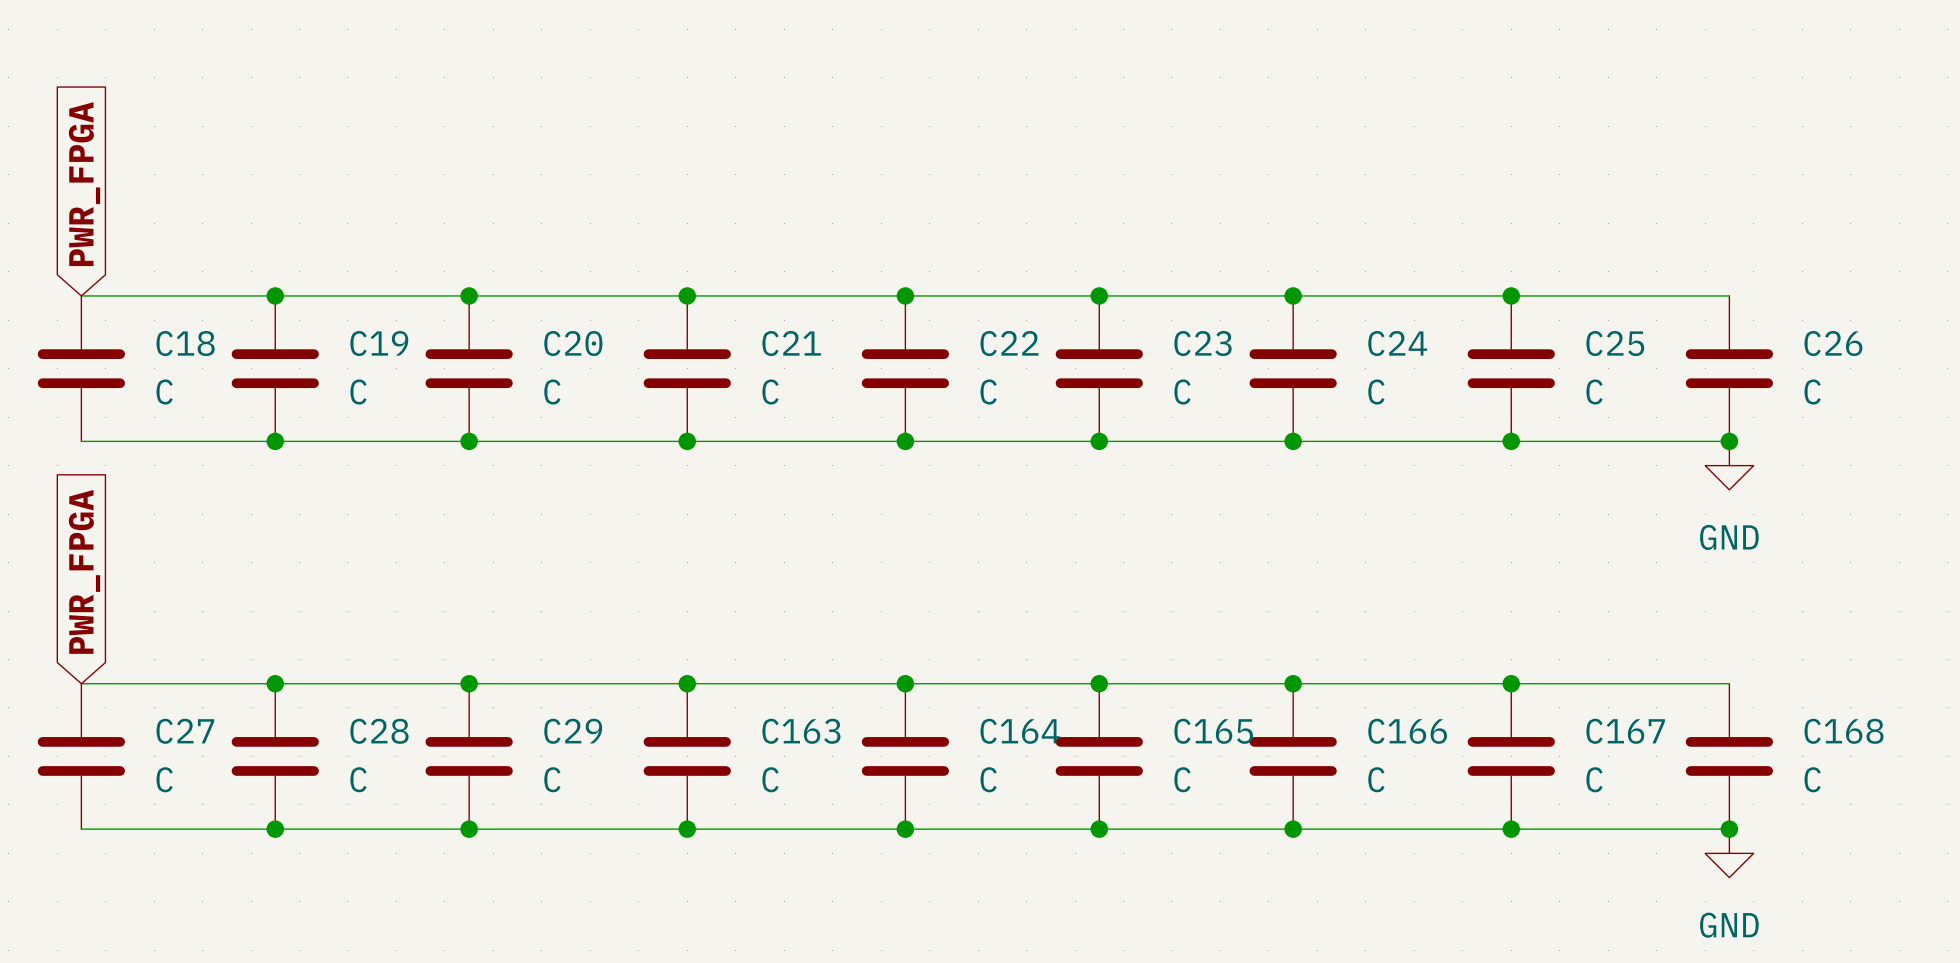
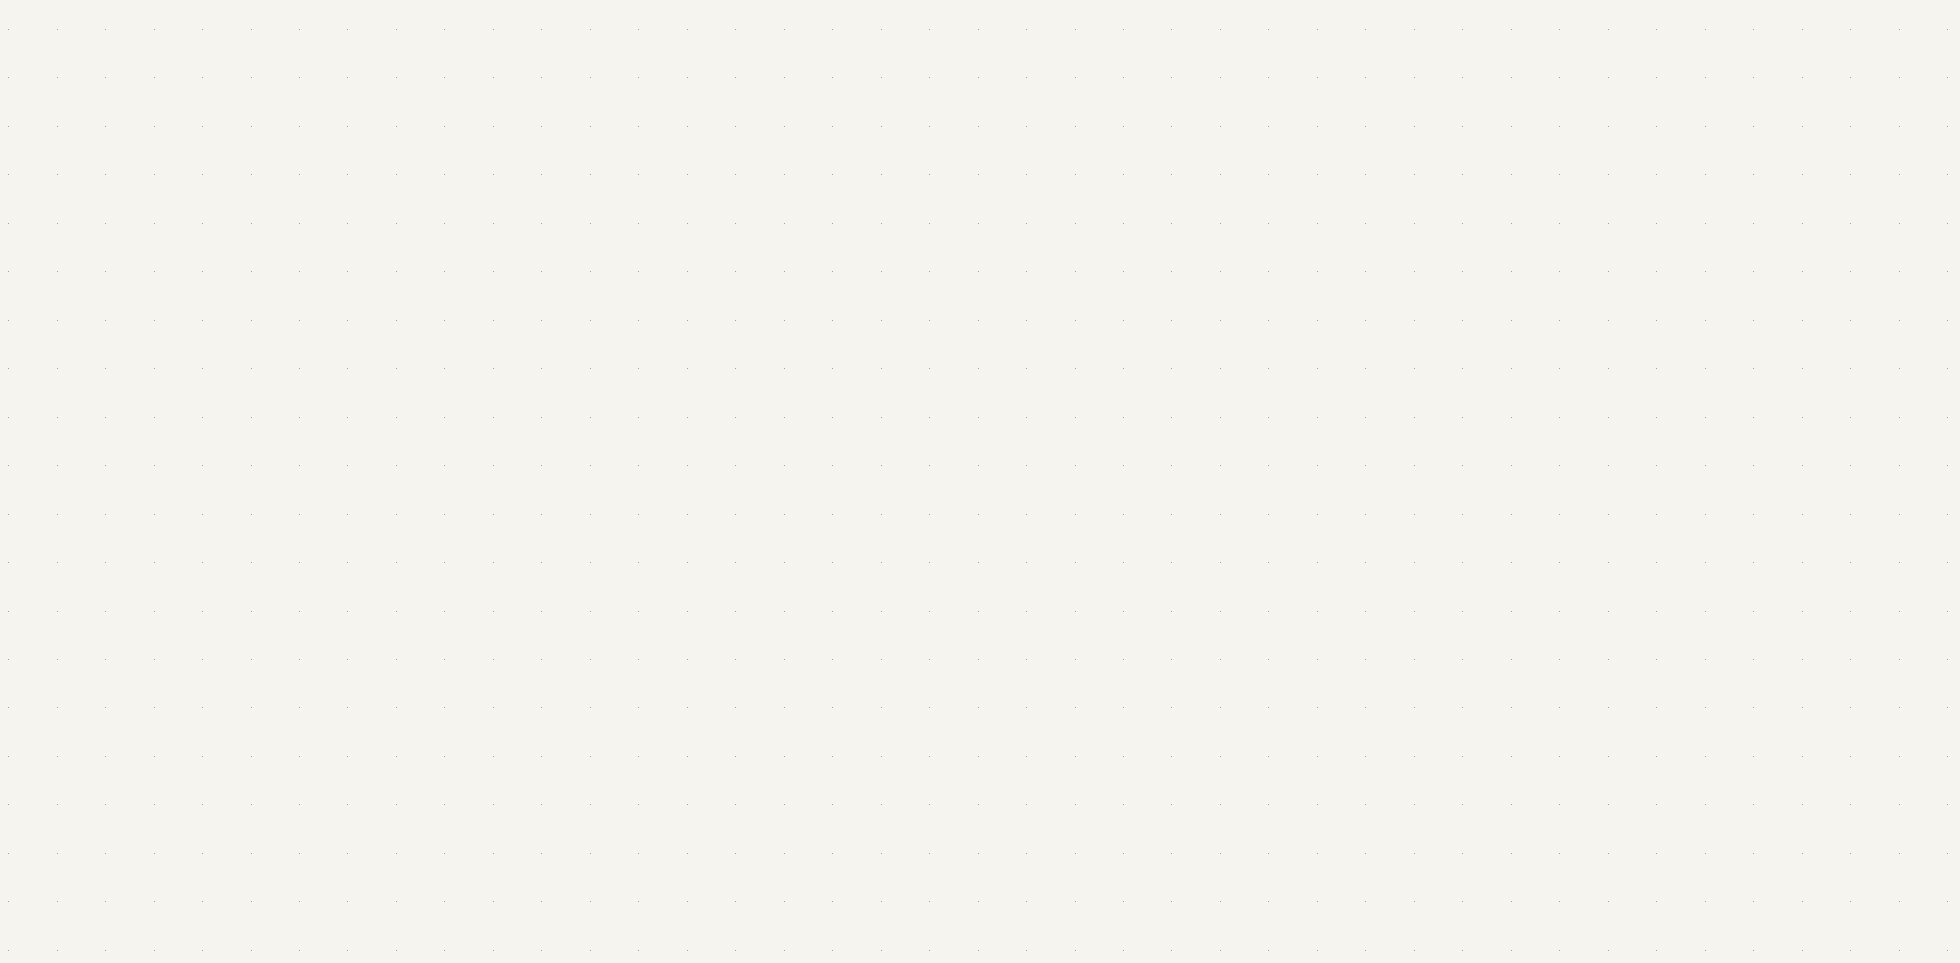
global label: PWR_FPGA (84, 184) -> none
wire: (81, 295) (1729, 295) -> none
junction: (275, 295) -> none
junction: (469, 295) -> none
junction: (687, 295) -> none
junction: (905, 295) -> none
junction: (1099, 295) -> none
junction: (1293, 295) -> none
junction: (1511, 295) -> none
C18: C (81, 368) -> none
C19: C (275, 368) -> none
C20: C (469, 368) -> none
C21: C (687, 368) -> none
C22: C (905, 368) -> none
C23: C (1099, 368) -> none
C24: C (1293, 368) -> none
C25: C (1511, 368) -> none
C26: C (1729, 368) -> none
wire: (81, 441) (1729, 441) -> none
junction: (275, 441) -> none
junction: (469, 441) -> none
junction: (687, 441) -> none
junction: (905, 441) -> none
junction: (1099, 441) -> none
junction: (1293, 441) -> none
junction: (1511, 441) -> none
junction: (1729, 441) -> none
power symbol: GND (1729, 465) -> none
global label: PWR_FPGA (84, 571) -> none
wire: (81, 683) (1729, 683) -> none
junction: (275, 683) -> none
junction: (469, 683) -> none
junction: (687, 683) -> none
junction: (905, 683) -> none
junction: (1099, 683) -> none
junction: (1293, 683) -> none
junction: (1511, 683) -> none
C27: C (81, 756) -> none
C28: C (275, 756) -> none
C29: C (469, 756) -> none
C163: C (687, 756) -> none
C164: C (905, 756) -> none
C165: C (1099, 756) -> none
C166: C (1293, 756) -> none
C167: C (1511, 756) -> none
C168: C (1729, 756) -> none
wire: (81, 829) (1729, 829) -> none
junction: (275, 829) -> none
junction: (469, 829) -> none
junction: (687, 829) -> none
junction: (905, 829) -> none
junction: (1099, 829) -> none
junction: (1293, 829) -> none
junction: (1511, 829) -> none
junction: (1729, 829) -> none
power symbol: GND (1729, 853) -> none

